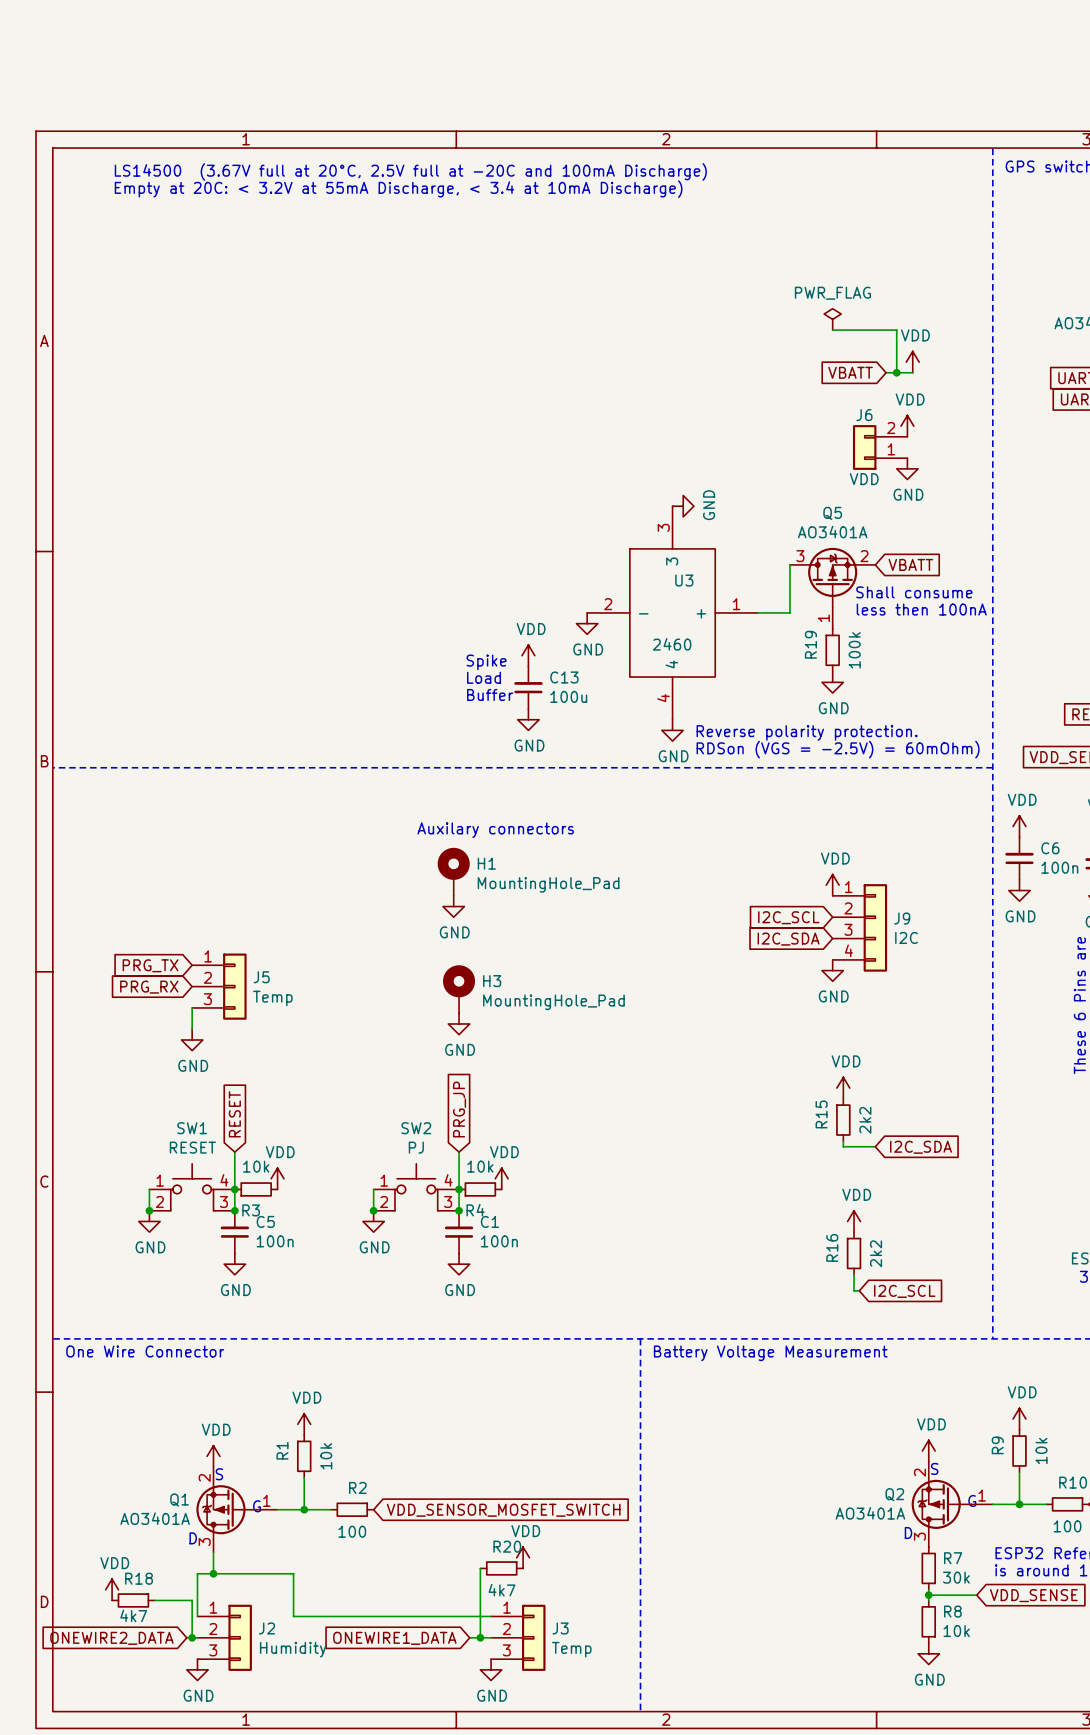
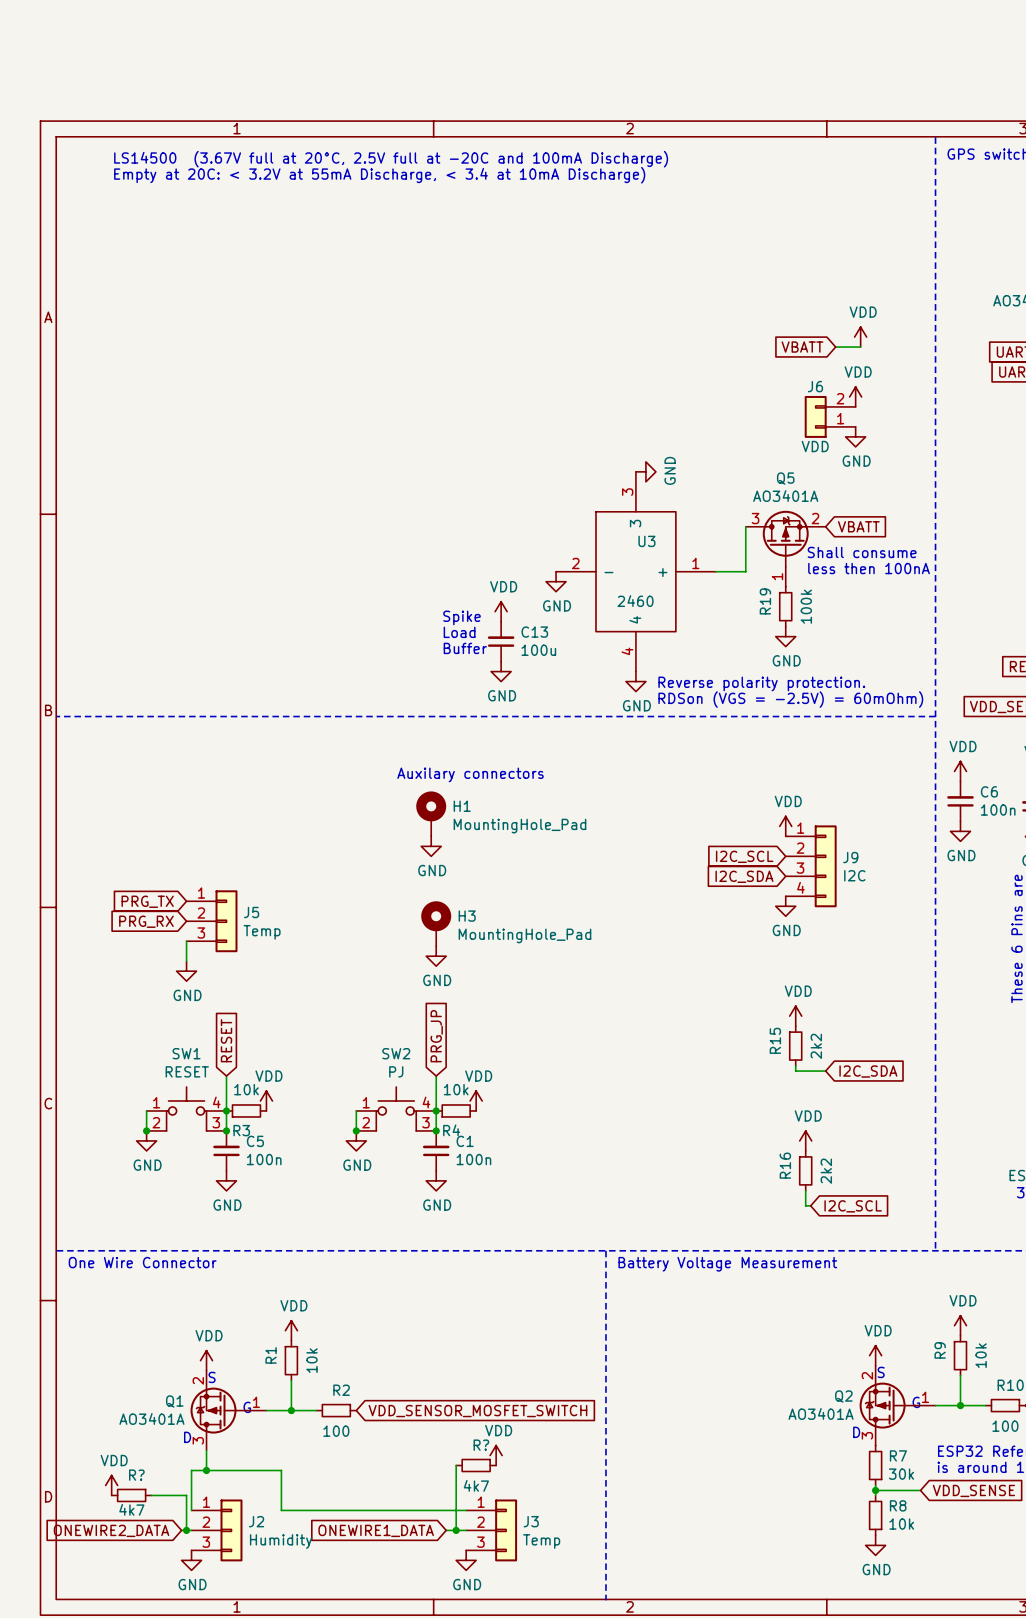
power symbol: PWR_FLAG (832, 319) -> none
wire: (832, 330) (896, 330) (896, 372) -> none
junction: (896, 372) -> none
R20 name: R20 (507, 1546) -> R? (481, 1445)
R18 name: R18 (139, 1578) -> R? (136, 1475)

